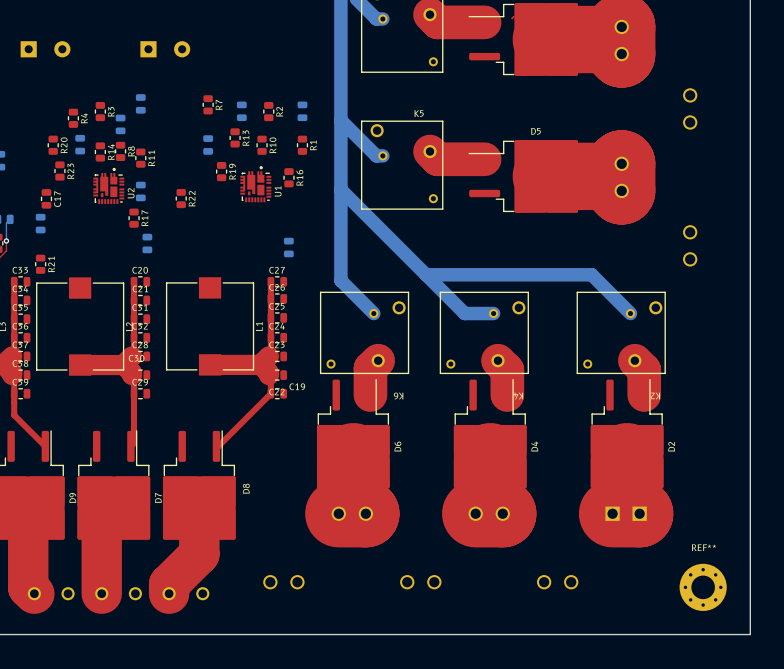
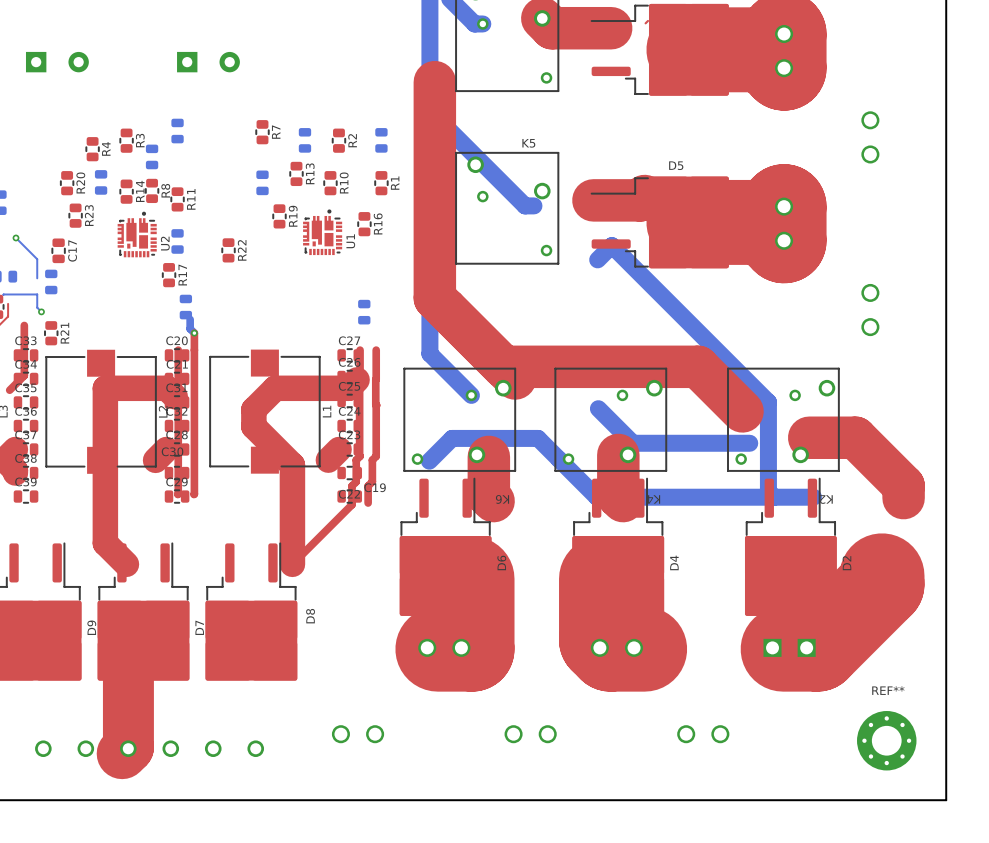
top track: none -> (434, 82) (434, 298) (515, 378)
bottom track: none -> (425, 106) (525, 205) (533, 205)
bottom track: (340, 120) (376, 155) (382, 155) -> none
top track: (430, 151) (437, 159) (484, 159) -> none
top track: none -> (644, 196) (640, 200) (593, 200)
bottom track: none -> (15, 237) (37, 259) (37, 278)
via: none -> (15, 237)
bottom track: (340, 189) (464, 313) (493, 313) -> none
bottom track: none -> (597, 259) (611, 245) (768, 402) (768, 491) (774, 497)
bottom track: (10, 219) (6, 223) (6, 240) -> none
bottom track: none -> (3, 294) (37, 294) (37, 307) (41, 311)
via: (6, 240) -> none
via: none -> (41, 311)
bottom track: none -> (190, 319) (190, 328) (194, 333)
top track: none -> (24, 325) (24, 375) (9, 390)
top track: none -> (194, 333) (193, 494)
via: none -> (194, 333)
bottom track: (426, 274) (591, 274) (630, 313) -> none
top track: none -> (178, 350) (177, 494)
top track: none -> (360, 350) (360, 456) (356, 460) (356, 481) (351, 486) (351, 504) (292, 564) (292, 465) (253, 426) (253, 409) (275, 388) (348, 388) (357, 379)
top track: none -> (376, 350) (376, 456) (372, 460) (372, 481) (368, 486) (368, 503)
top track: (14, 281) (14, 415) (45, 446) -> none
top track: (134, 281) (134, 443) (130, 446) -> none
top track: (270, 281) (270, 393) (216, 446) -> none
top track: none -> (503, 366) (697, 366) (742, 411)
top track: none -> (175, 396) (166, 388) (105, 388) (105, 543) (126, 564)
bottom track: none -> (598, 408) (632, 443) (749, 443)
top track: none -> (809, 437) (855, 437) (903, 485) (903, 498)
top track: (378, 360) (370, 368) (370, 395) -> none
top track: none -> (618, 454) (618, 496) (623, 501)
top track: (497, 360) (507, 370) (507, 395) -> none
top track: (634, 360) (644, 370) (644, 395) -> none
top track: none -> (488, 456) (488, 496) (493, 501)
top track: (210, 364) (260, 364) (268, 375) -> none
top track: (80, 365) (123, 365) (131, 375) -> none
bottom track: none -> (429, 461) (452, 438) (538, 438) (596, 497) (813, 497)
top track: (353, 456) (353, 501) (365, 513) (338, 513) -> none
top track: (490, 456) (490, 501) (502, 513) (475, 513) -> none
top track: (627, 456) (627, 501) (639, 513) (612, 513) -> none
top track: none -> (882, 575) (882, 584) (817, 649) (783, 649)
top track: none -> (472, 578) (472, 649) (437, 649)
top track: none -> (601, 578) (601, 640) (610, 649) (644, 649)
top track: (28, 508) (28, 587) (34, 593) -> none
top track: (113, 508) (101, 520) (101, 593) -> none
top track: (199, 508) (199, 554) (169, 584) (169, 593) -> none
top track: none -> (128, 662) (128, 747) (122, 753)

